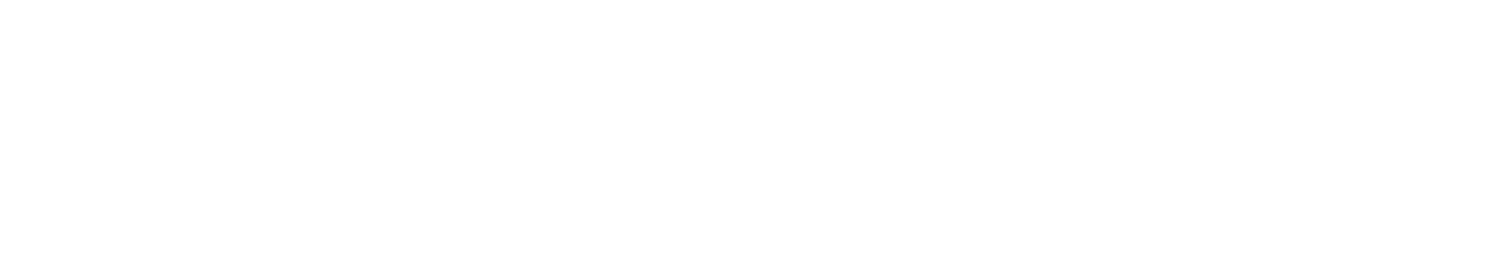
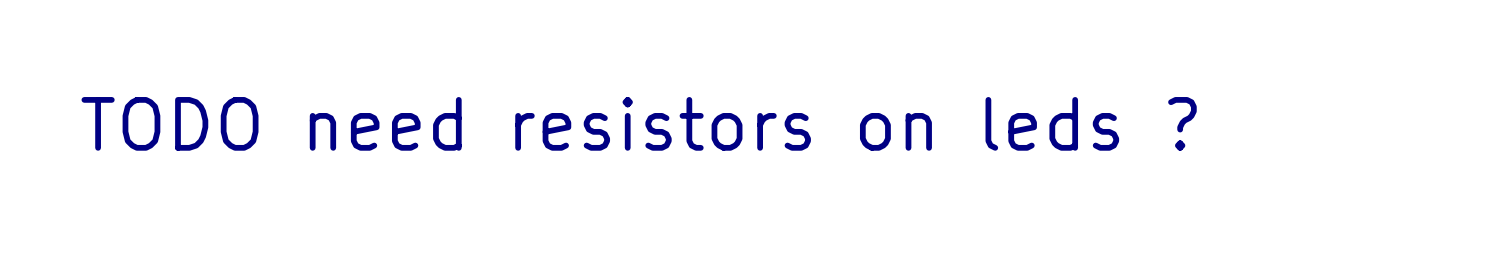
text: none -> TODO need resistors on leds ? (639, 123)

